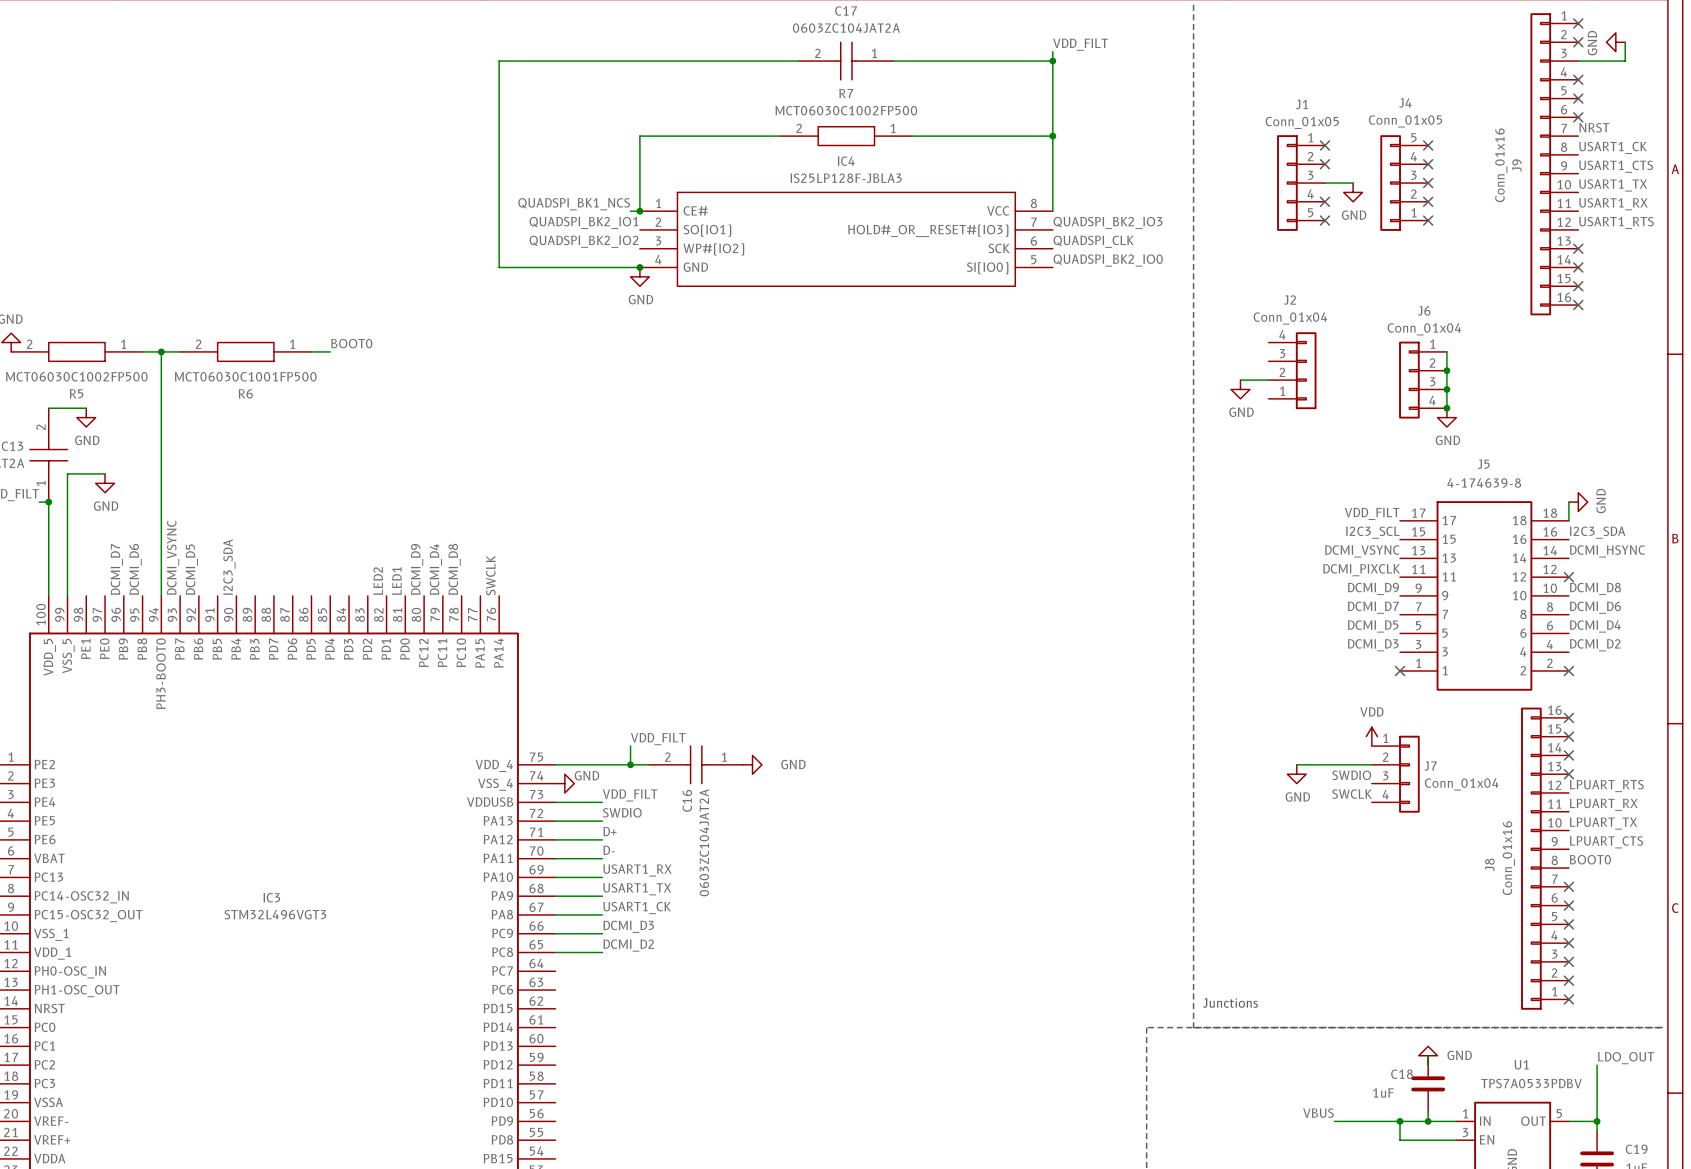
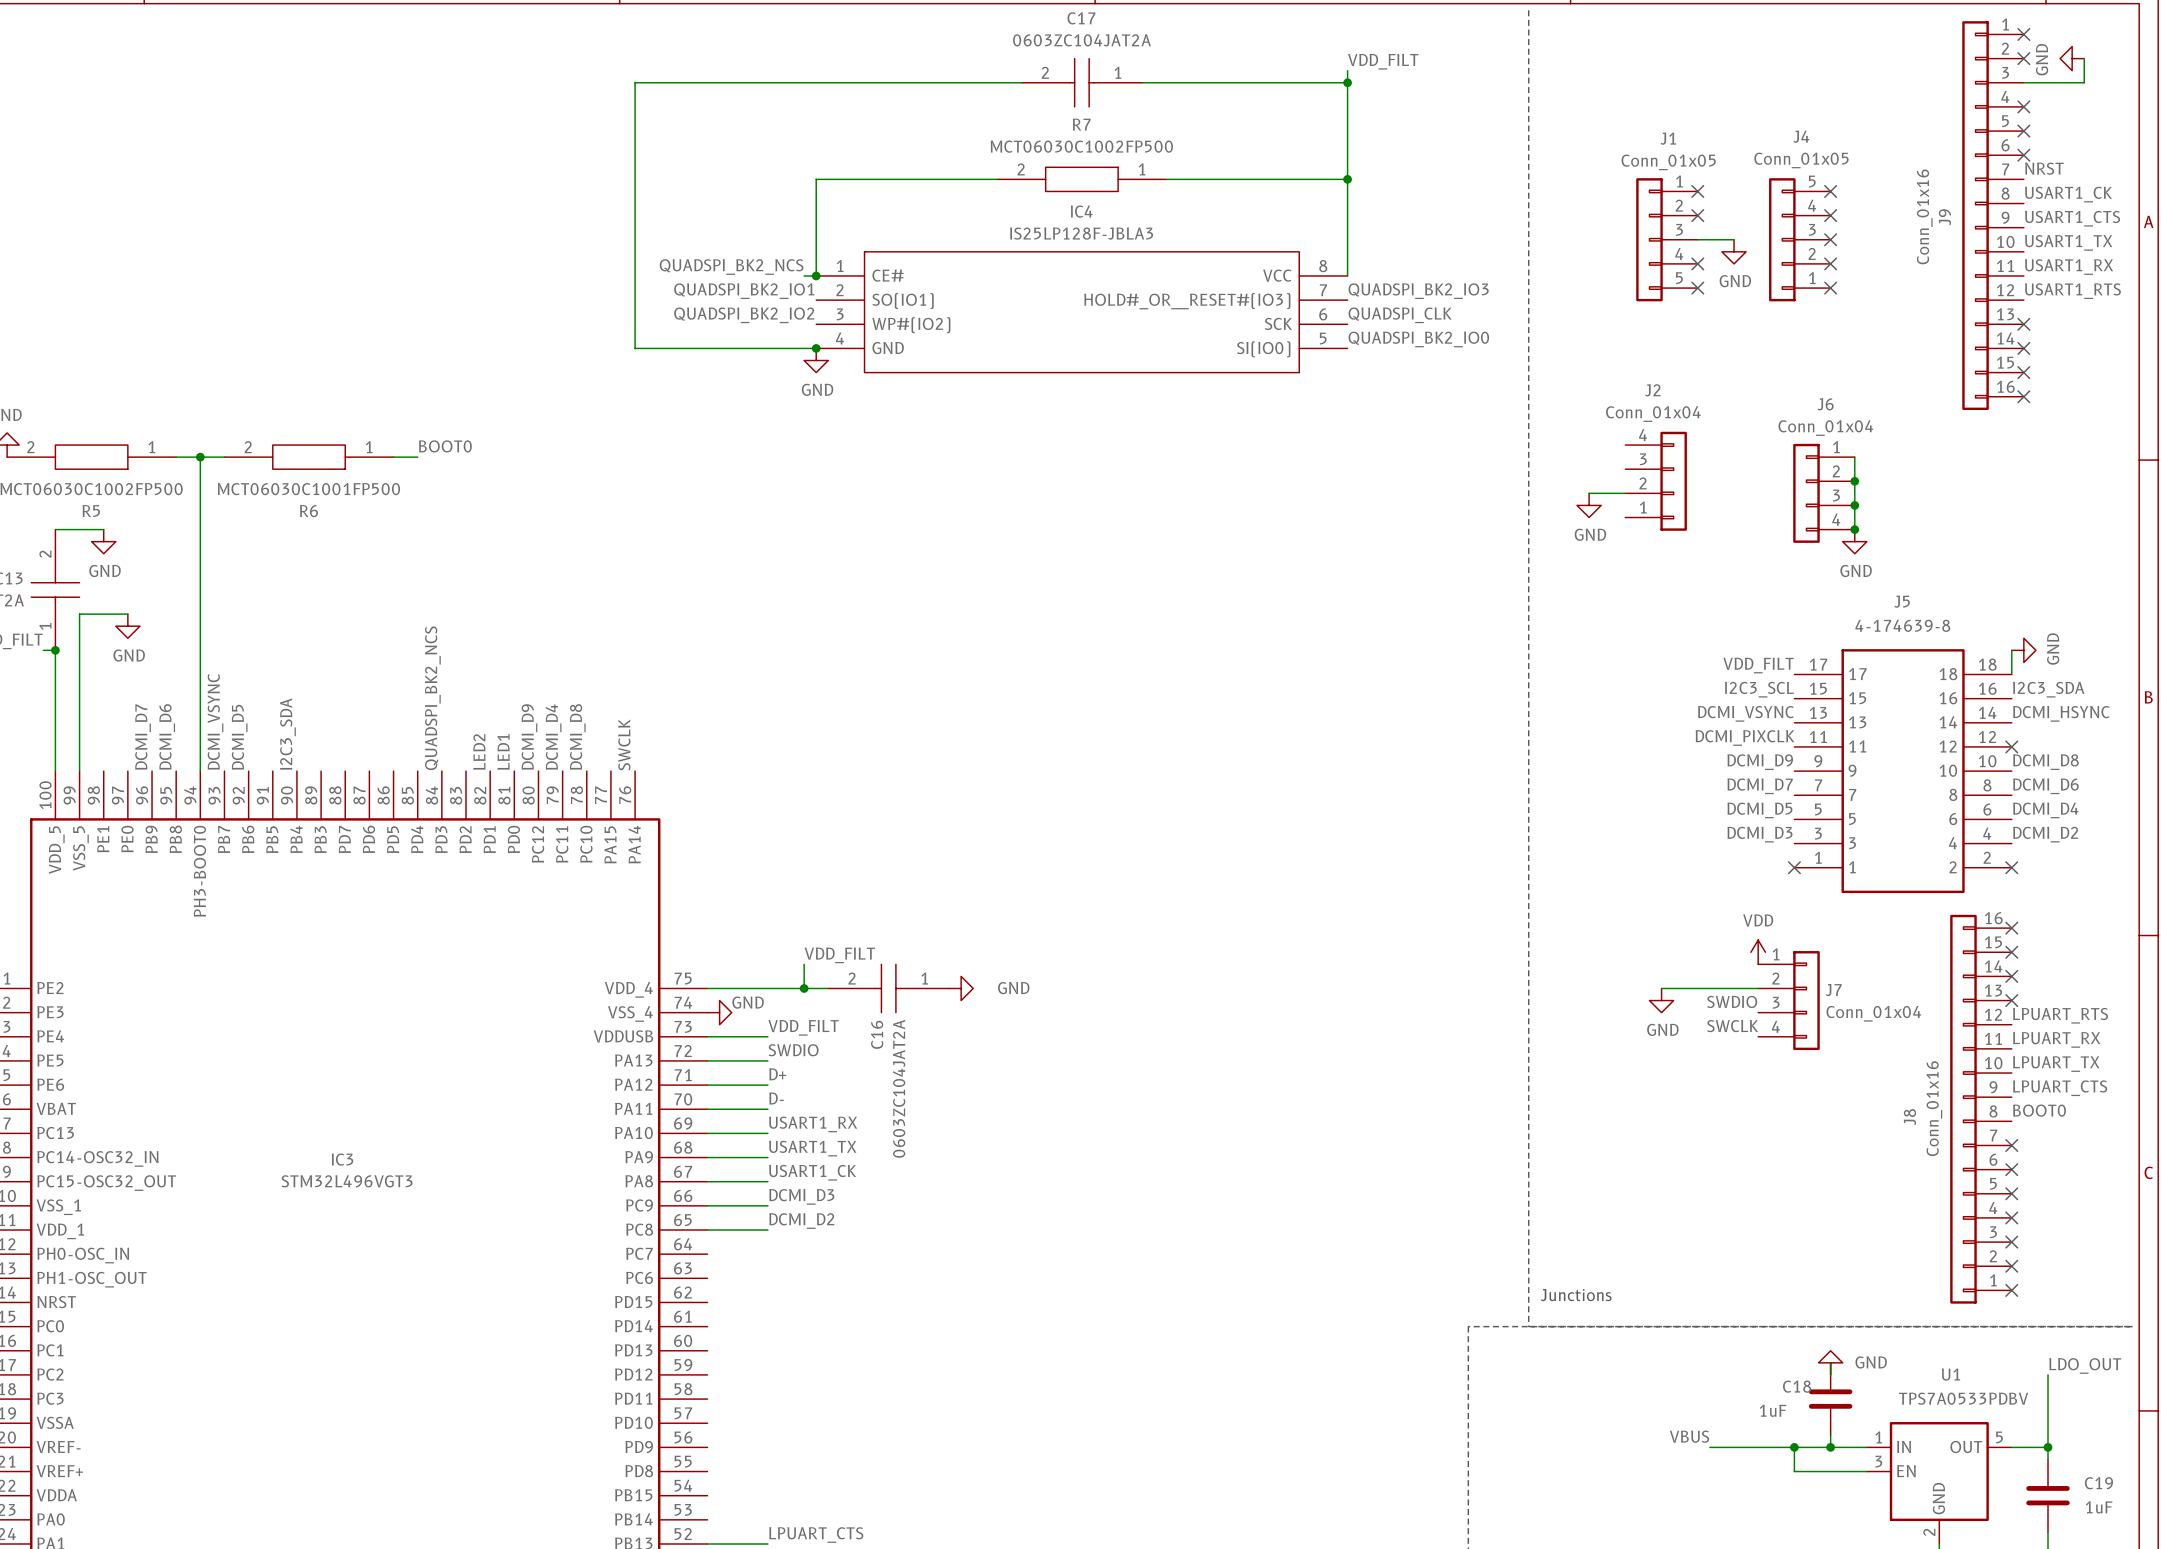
label: QUADSPI_BK1_NCS (574, 204) -> QUADSPI_BK2_NCS (731, 267)
label: none -> QUADSPI_BK2_NCS (432, 698)

